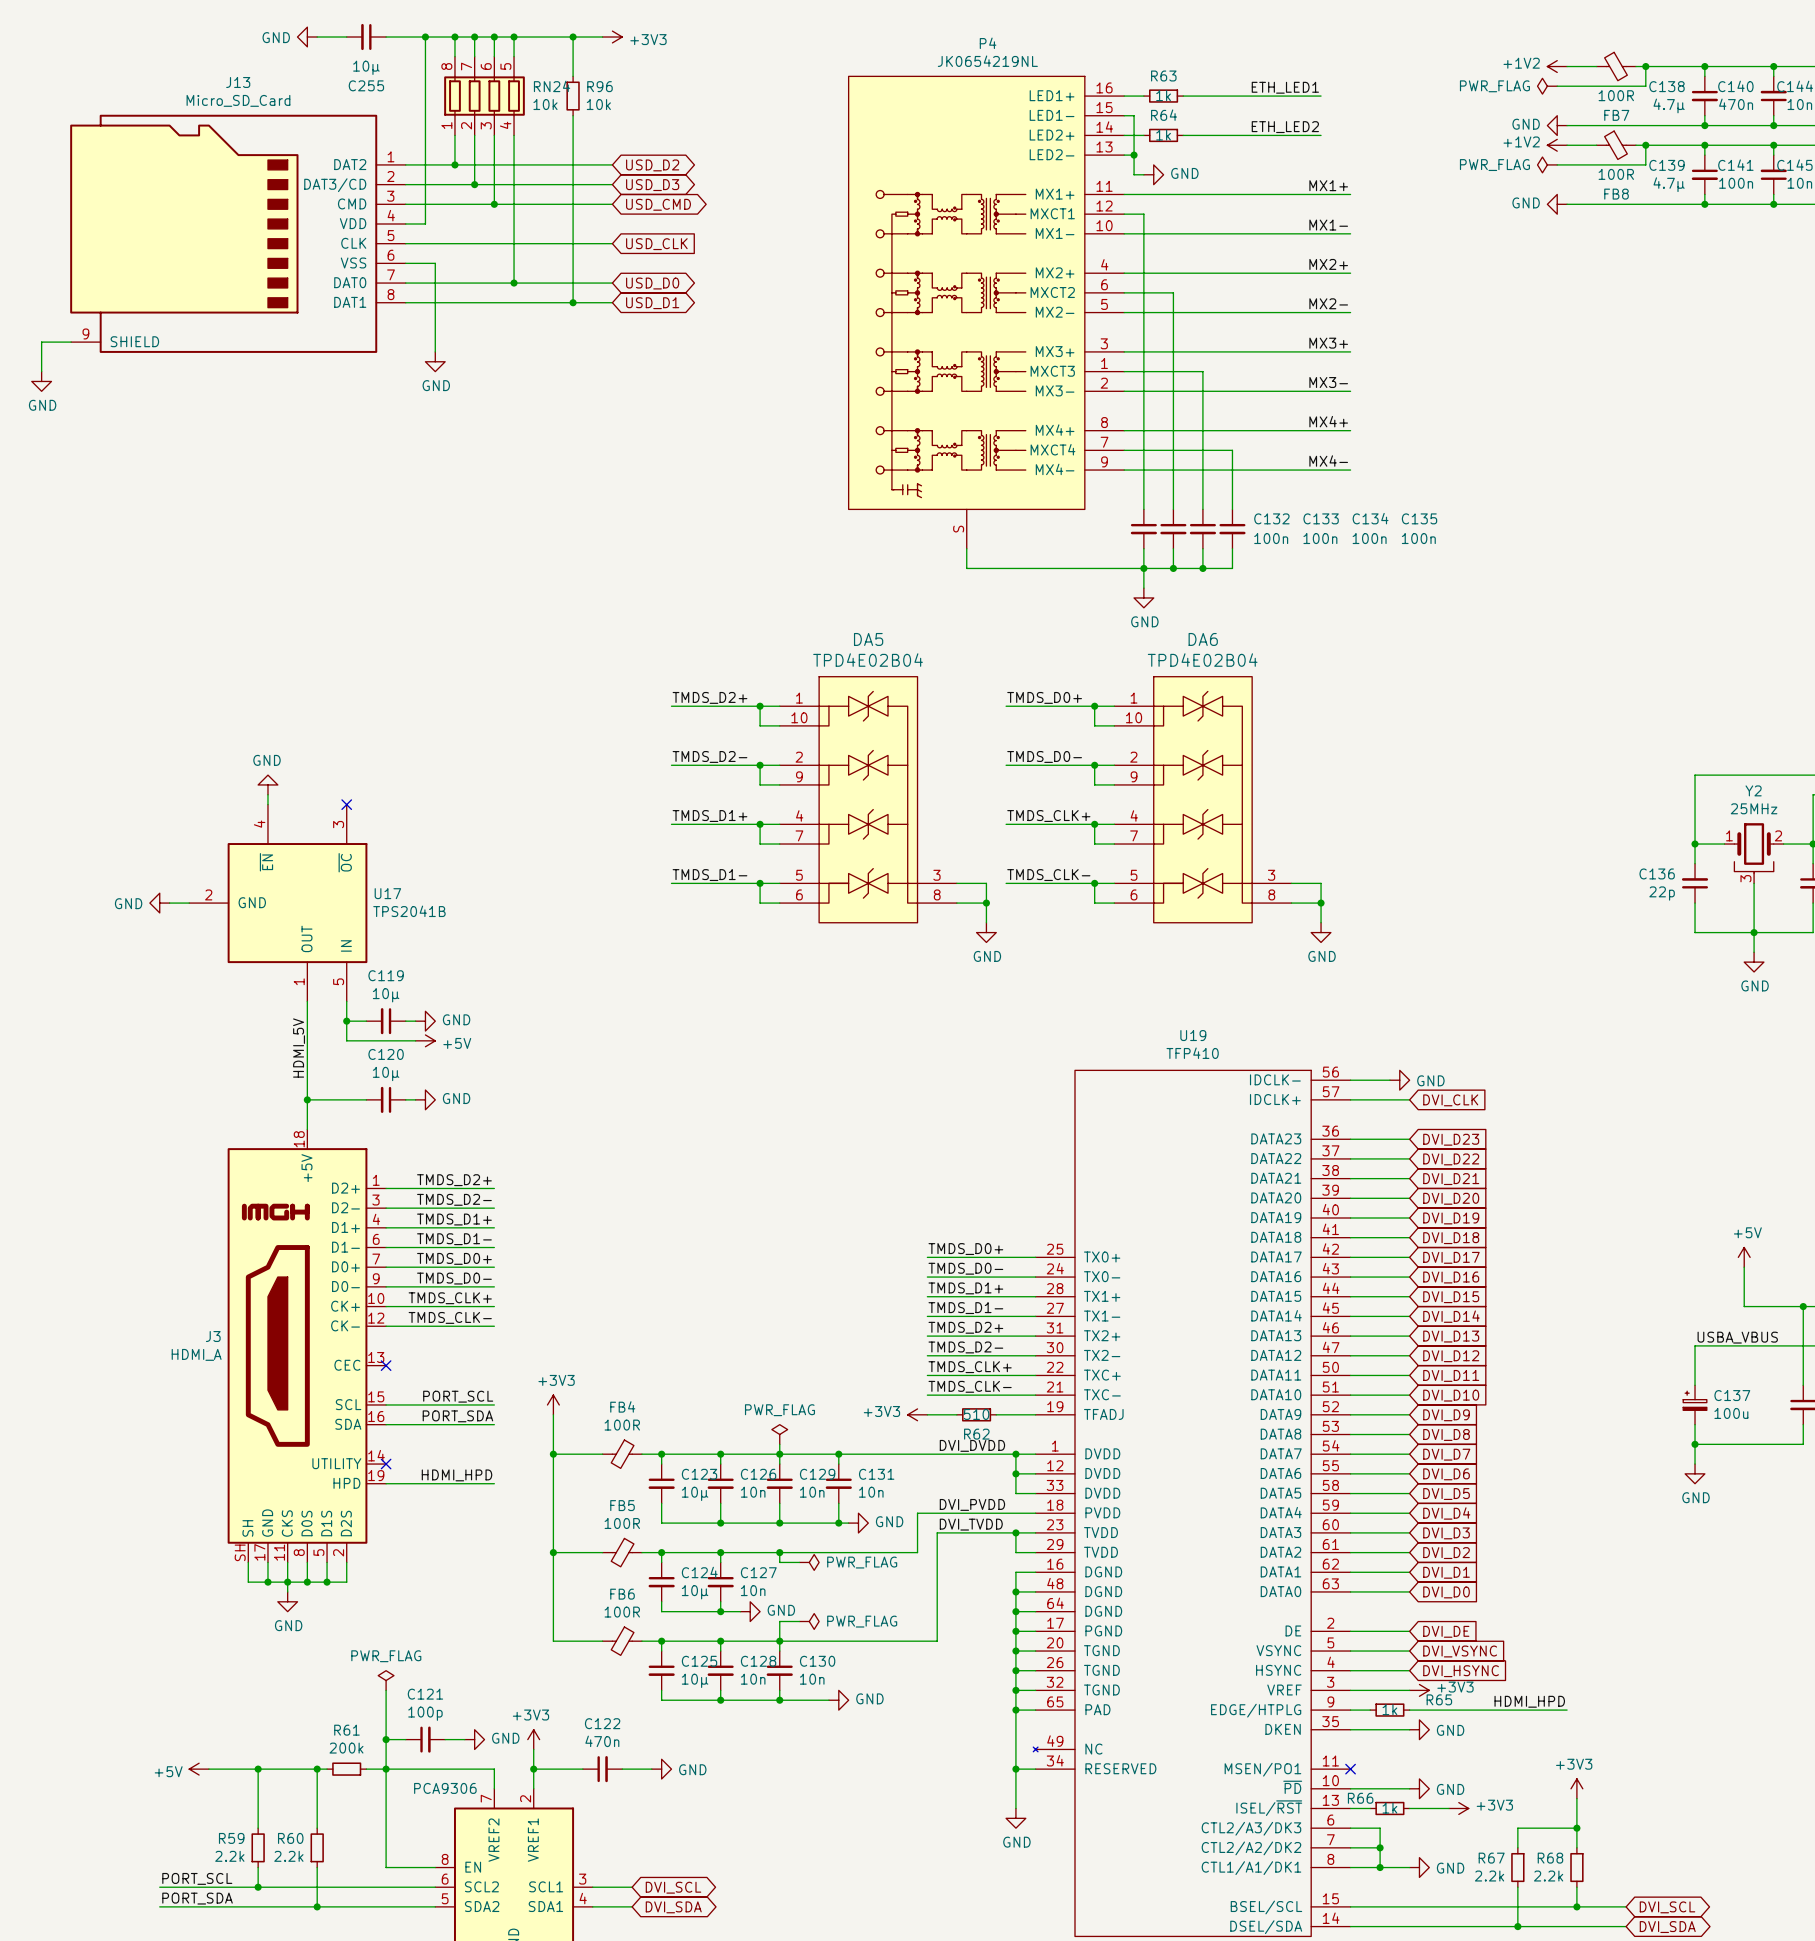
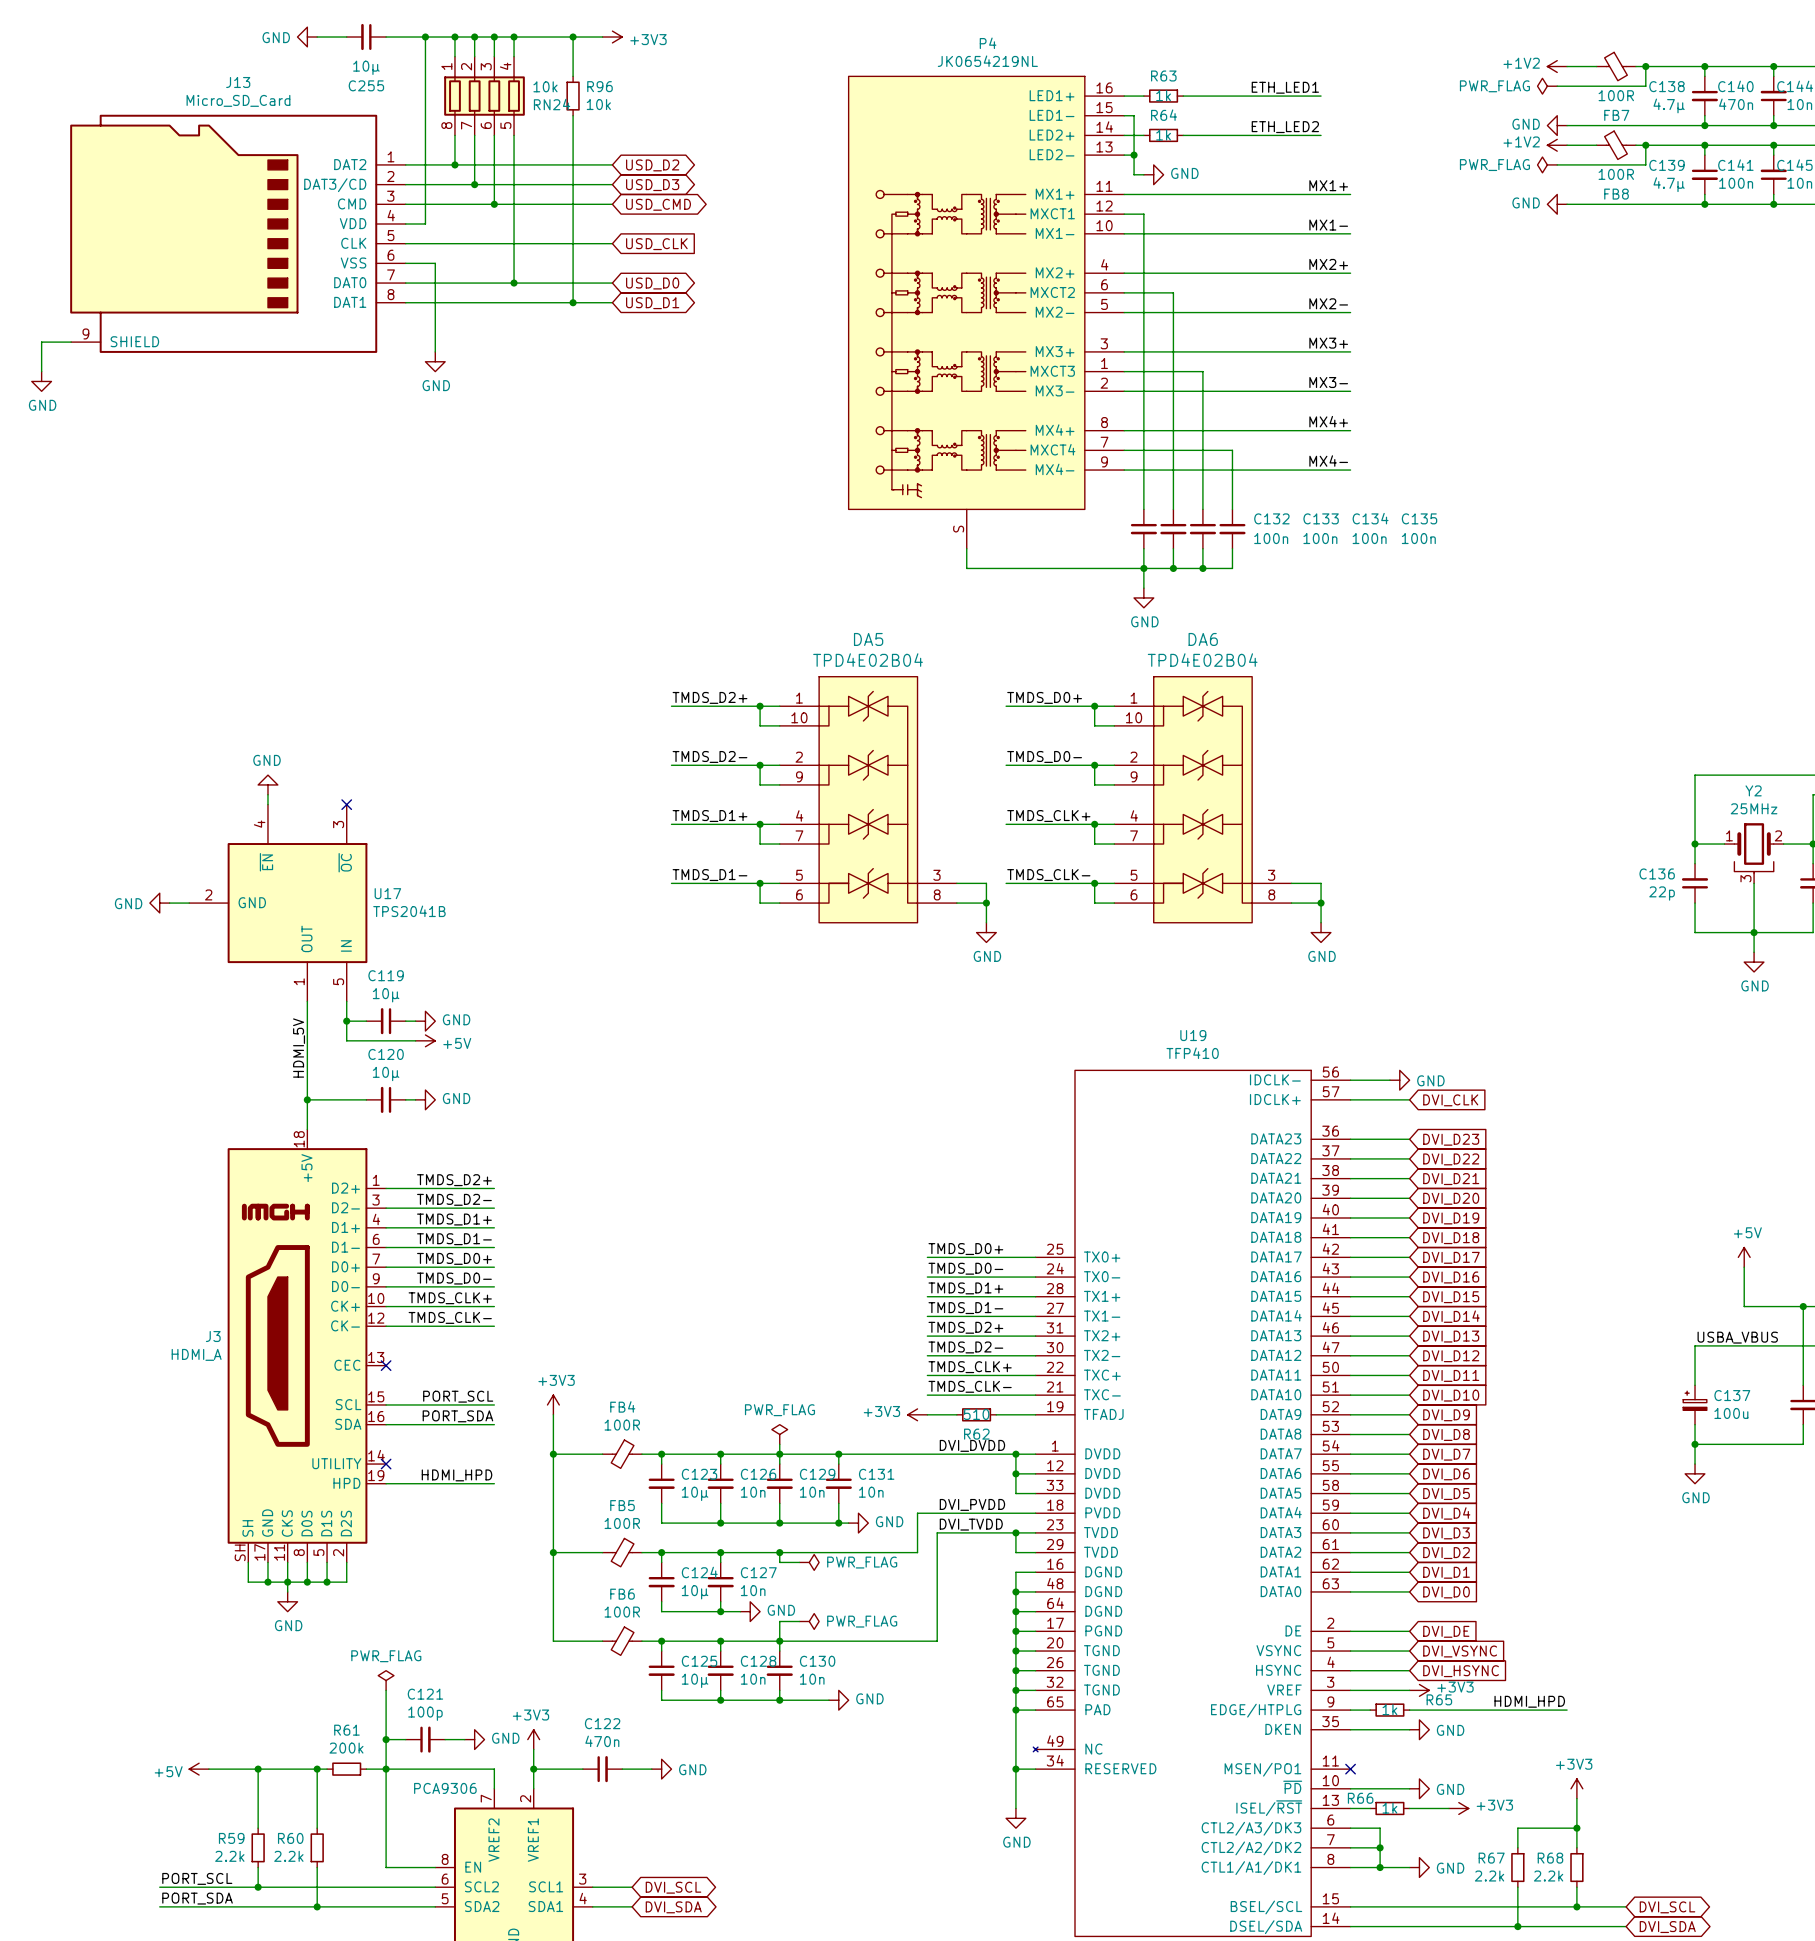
RN24 flip: as is (484, 96) -> up-down (484, 96)

